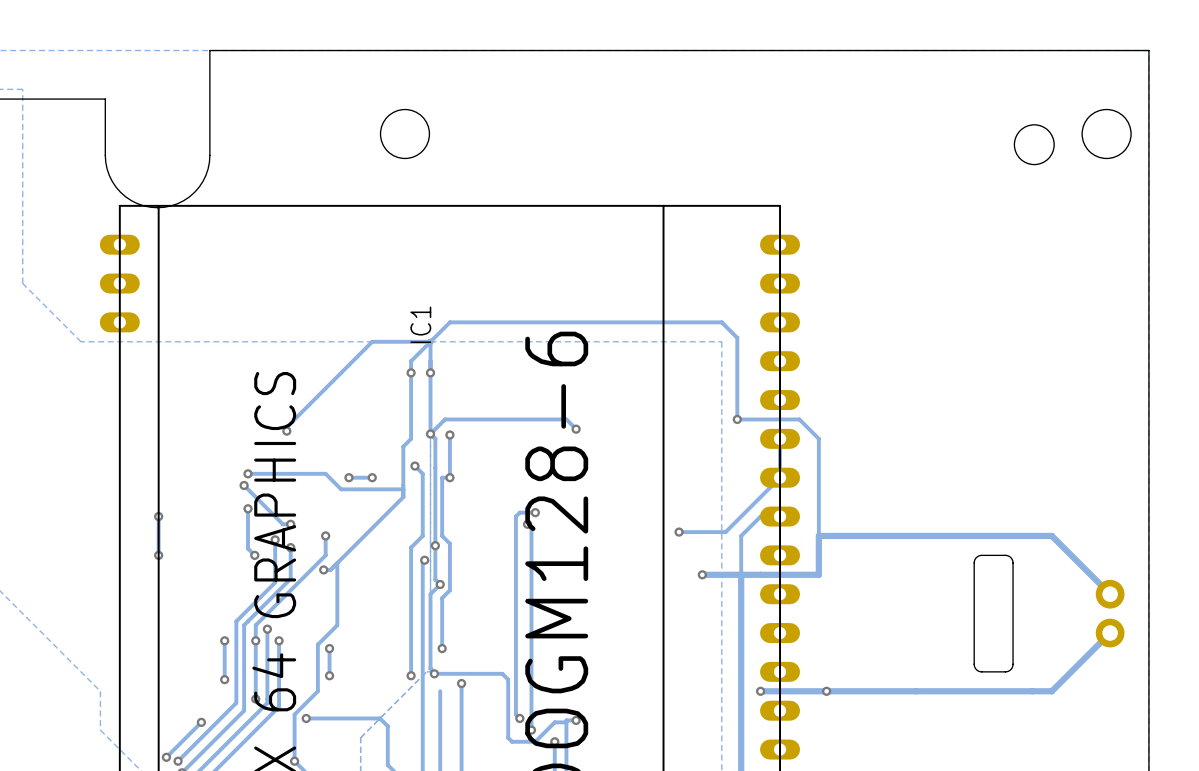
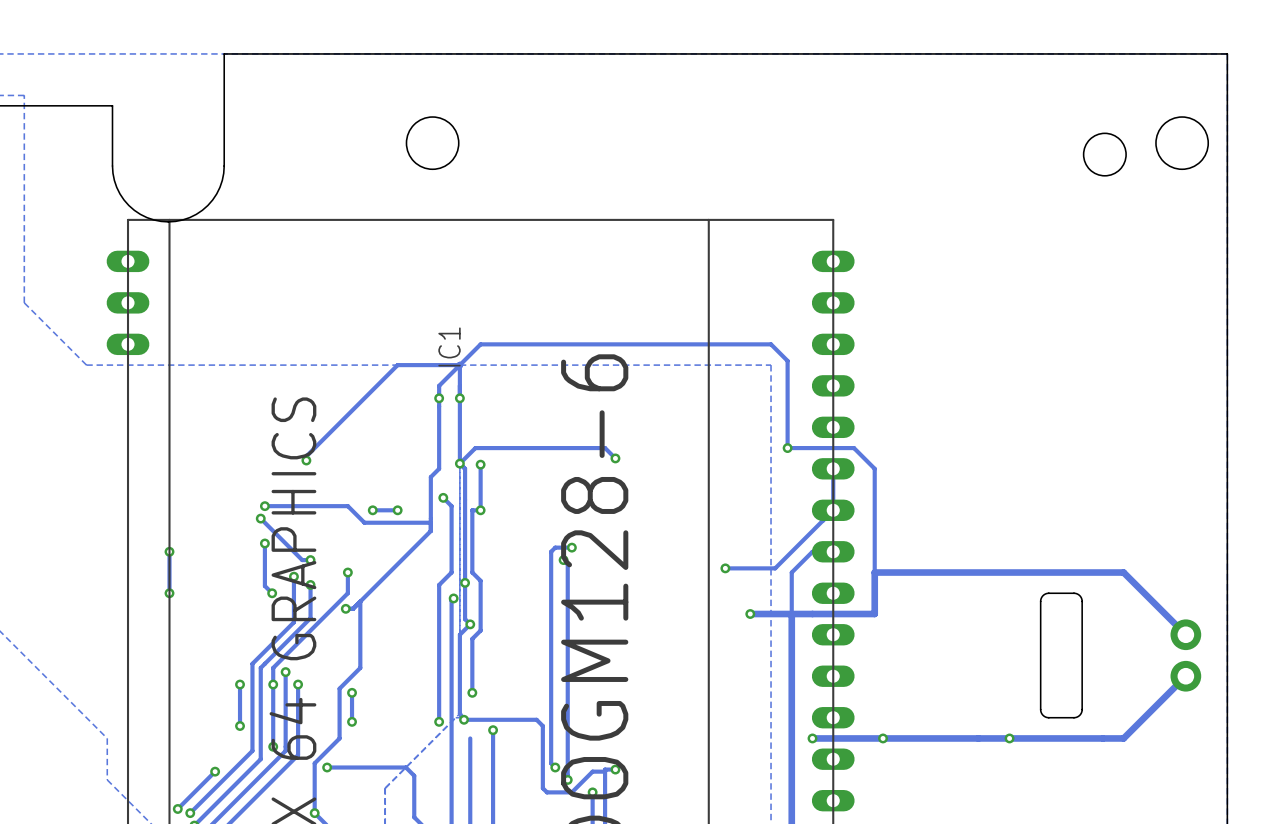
via: none -> (1009, 738)

